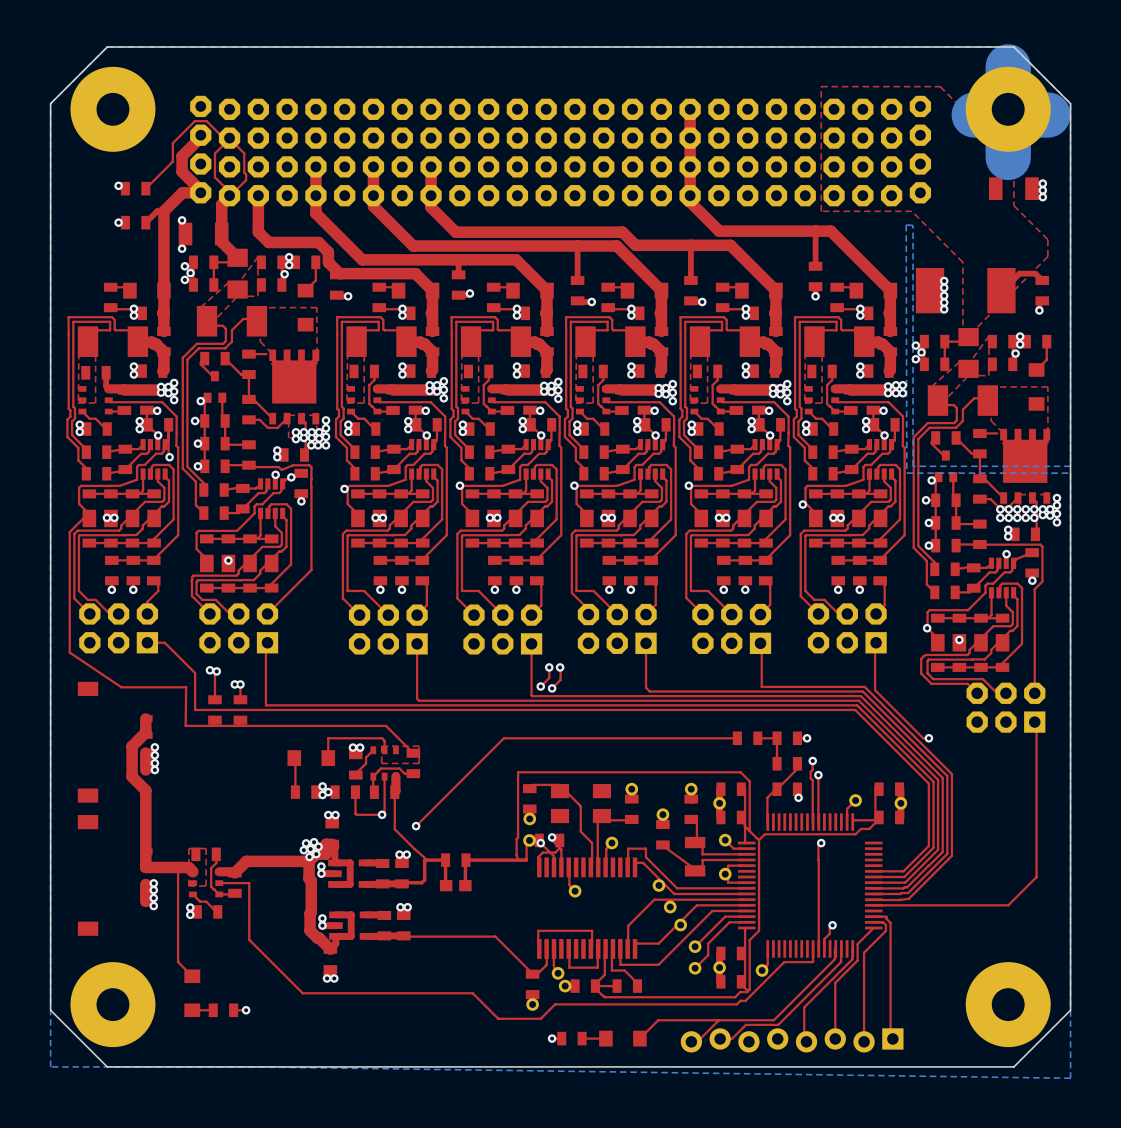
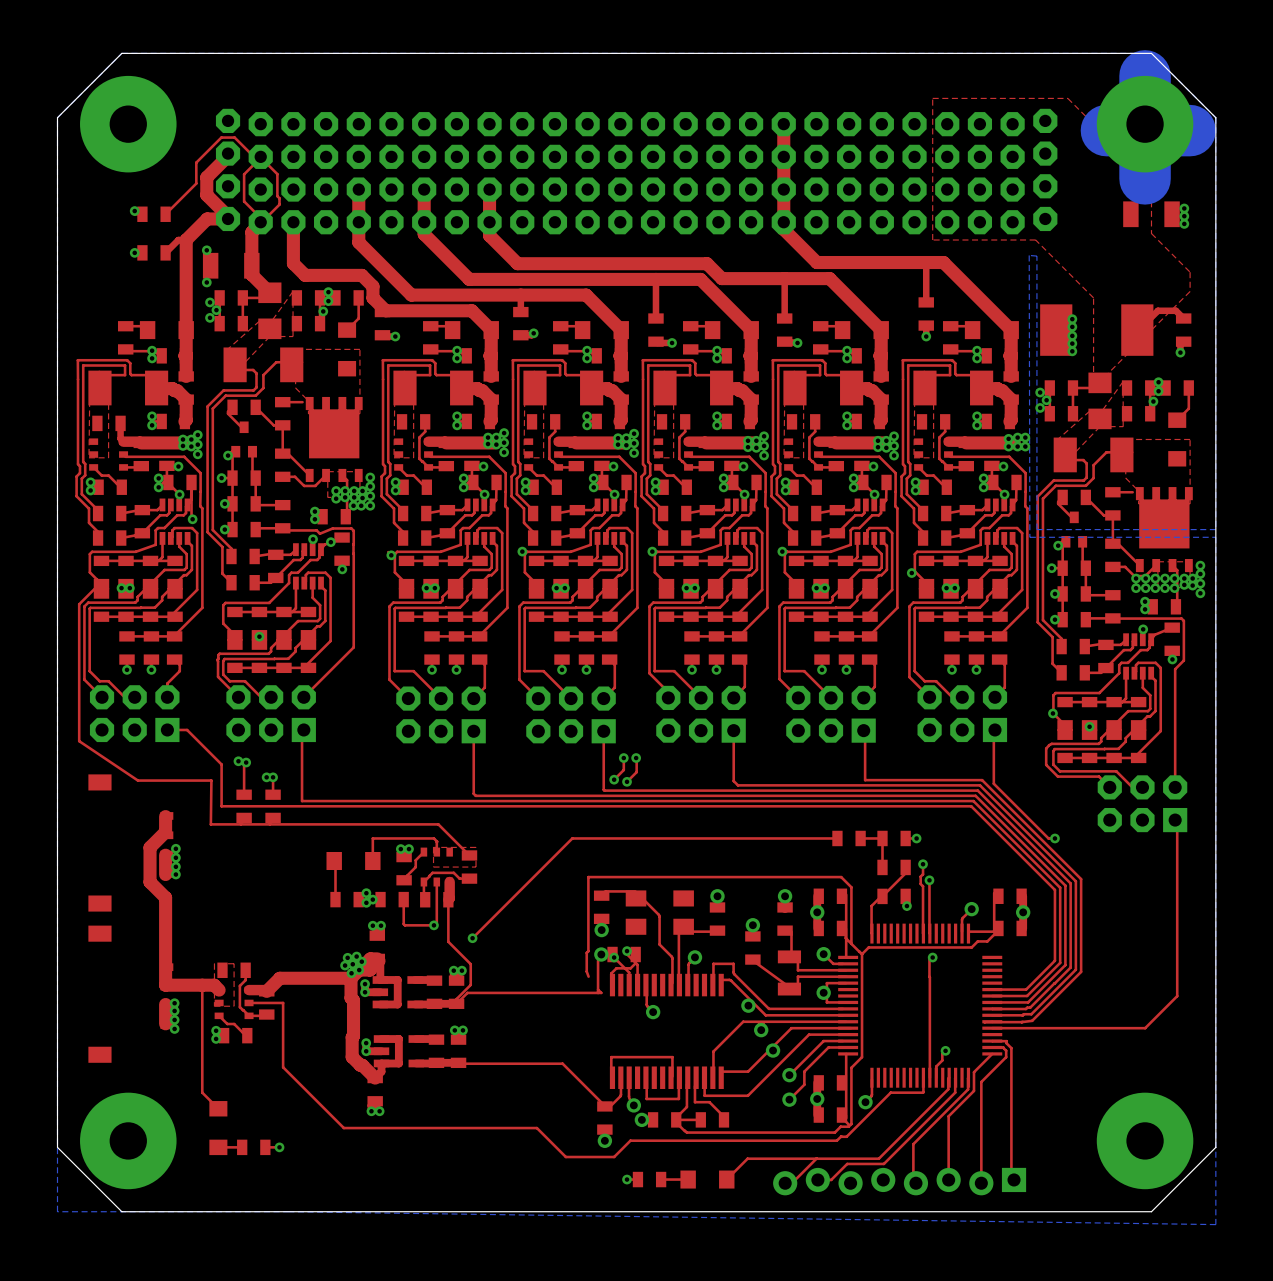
top track: (414, 848) (425, 858) -> (470, 964) (470, 984) (456, 999) (456, 1003)
part: (455, 860) -> none
top track: (465, 860) (520, 860) (518, 859) (526, 859) (465, 860) -> none
top track: (465, 860) (465, 885) -> none
top track: none -> (598, 976) (598, 992)
top track: (403, 882) (421, 882) (424, 879) (424, 860) (445, 860) (446, 885) -> (457, 1002) (467, 992) (601, 992) (598, 989)
part: (455, 885) -> none

